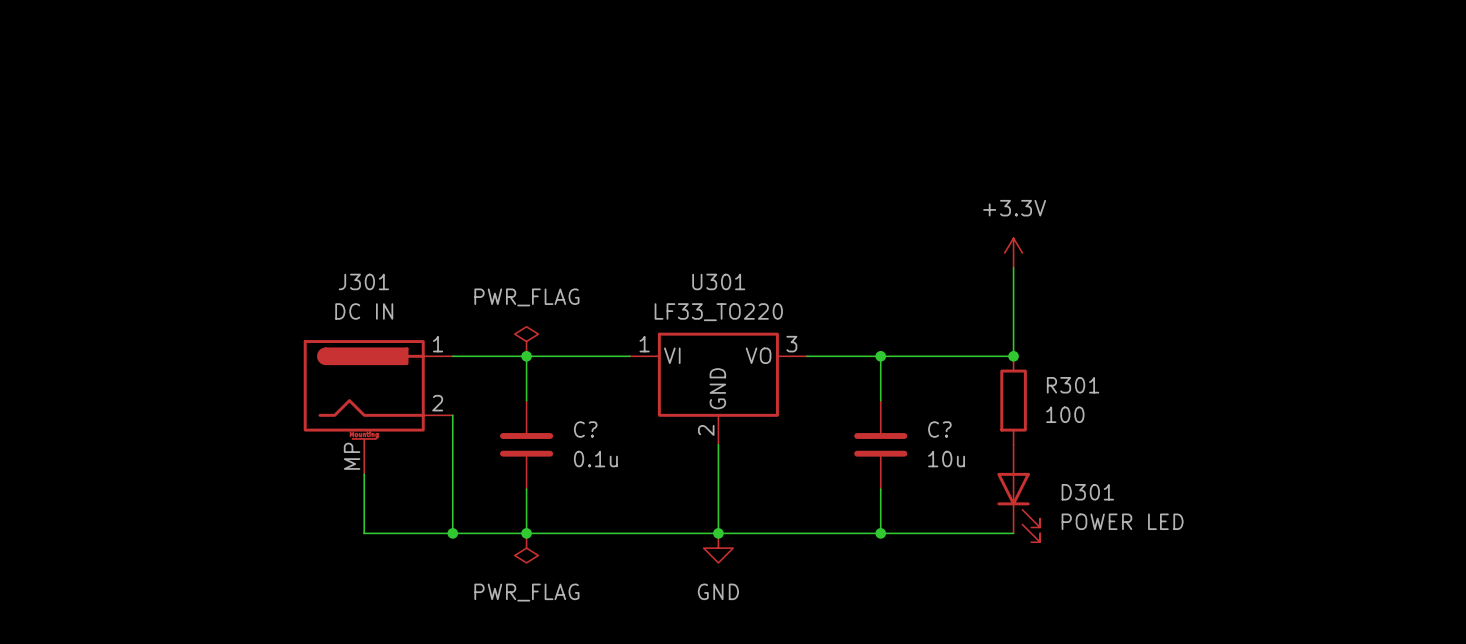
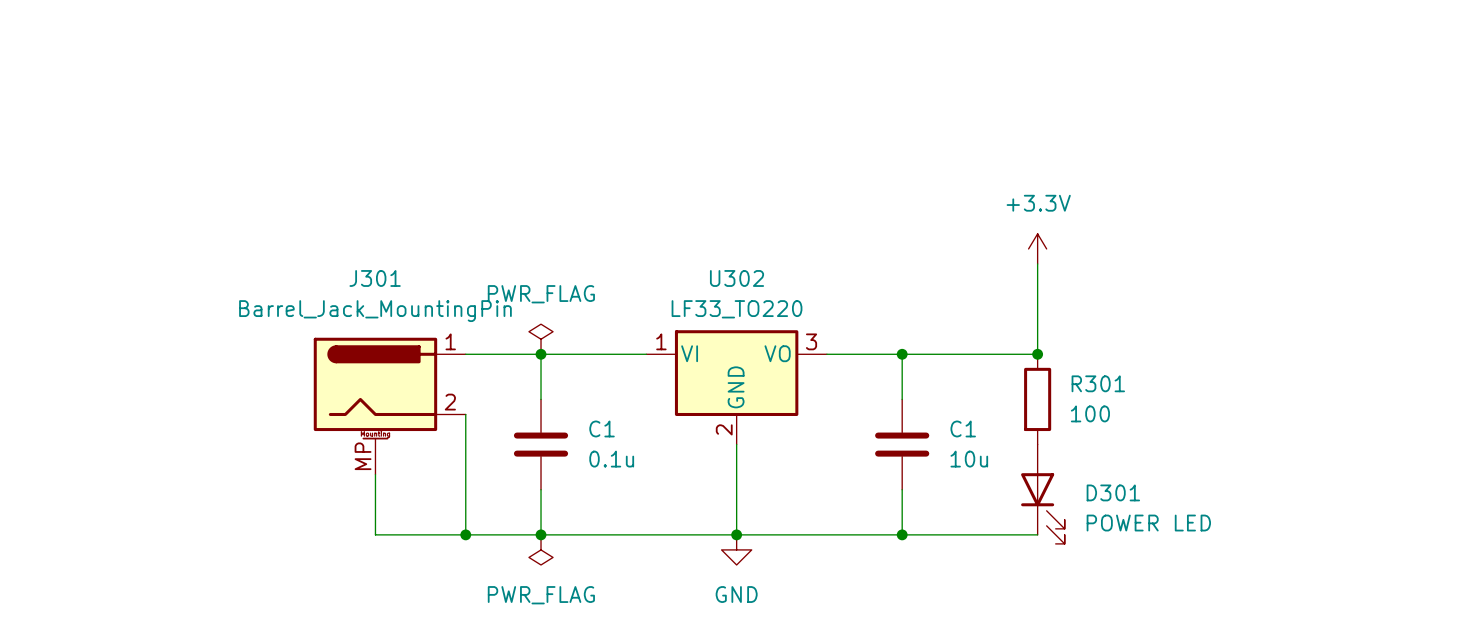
U301 name: U301 (718, 281) -> U302 (737, 278)
J301 value: DC IN (364, 311) -> Barrel_Jack_MountingPin (375, 311)
C? name: C? (585, 429) -> C1 (602, 428)
C? name: C? (939, 429) -> C1 (963, 428)

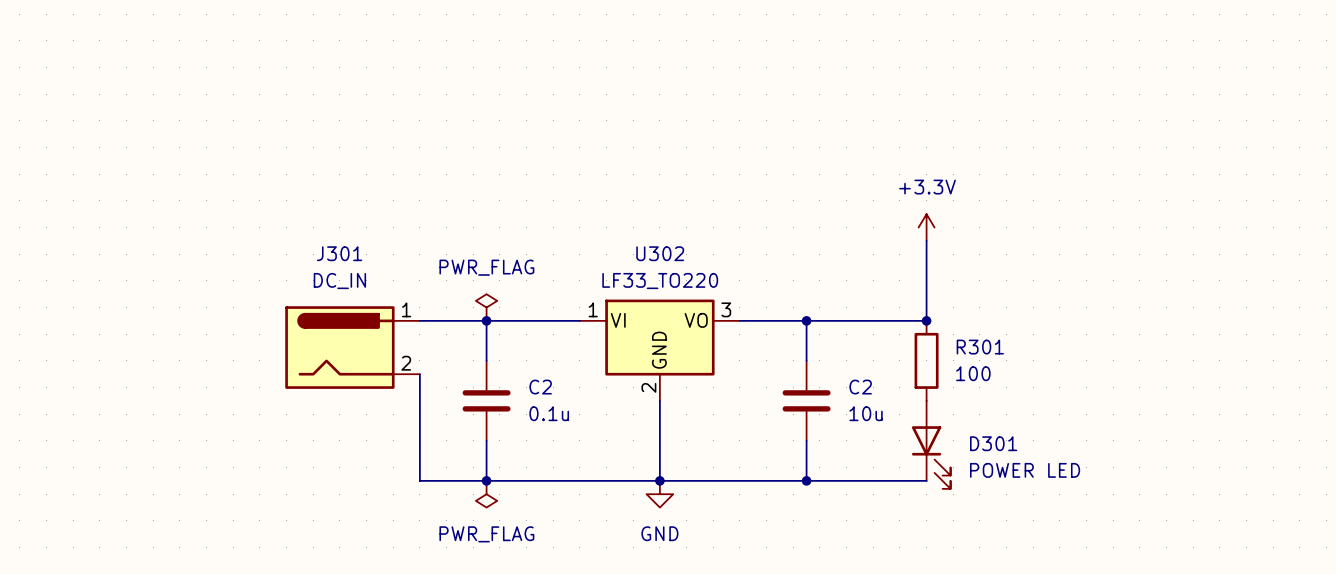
J301 value: Barrel_Jack_MountingPin (375, 311) -> DC_IN (339, 281)
J301 symbol: [313, 337, 466, 475] -> [285, 306, 420, 389]
C1 name: C1 (602, 428) -> C2 (540, 387)
C1 name: C1 (963, 428) -> C2 (860, 387)
wire: (375, 474) (375, 534) (465, 534) -> none
junction: (465, 534) -> none

